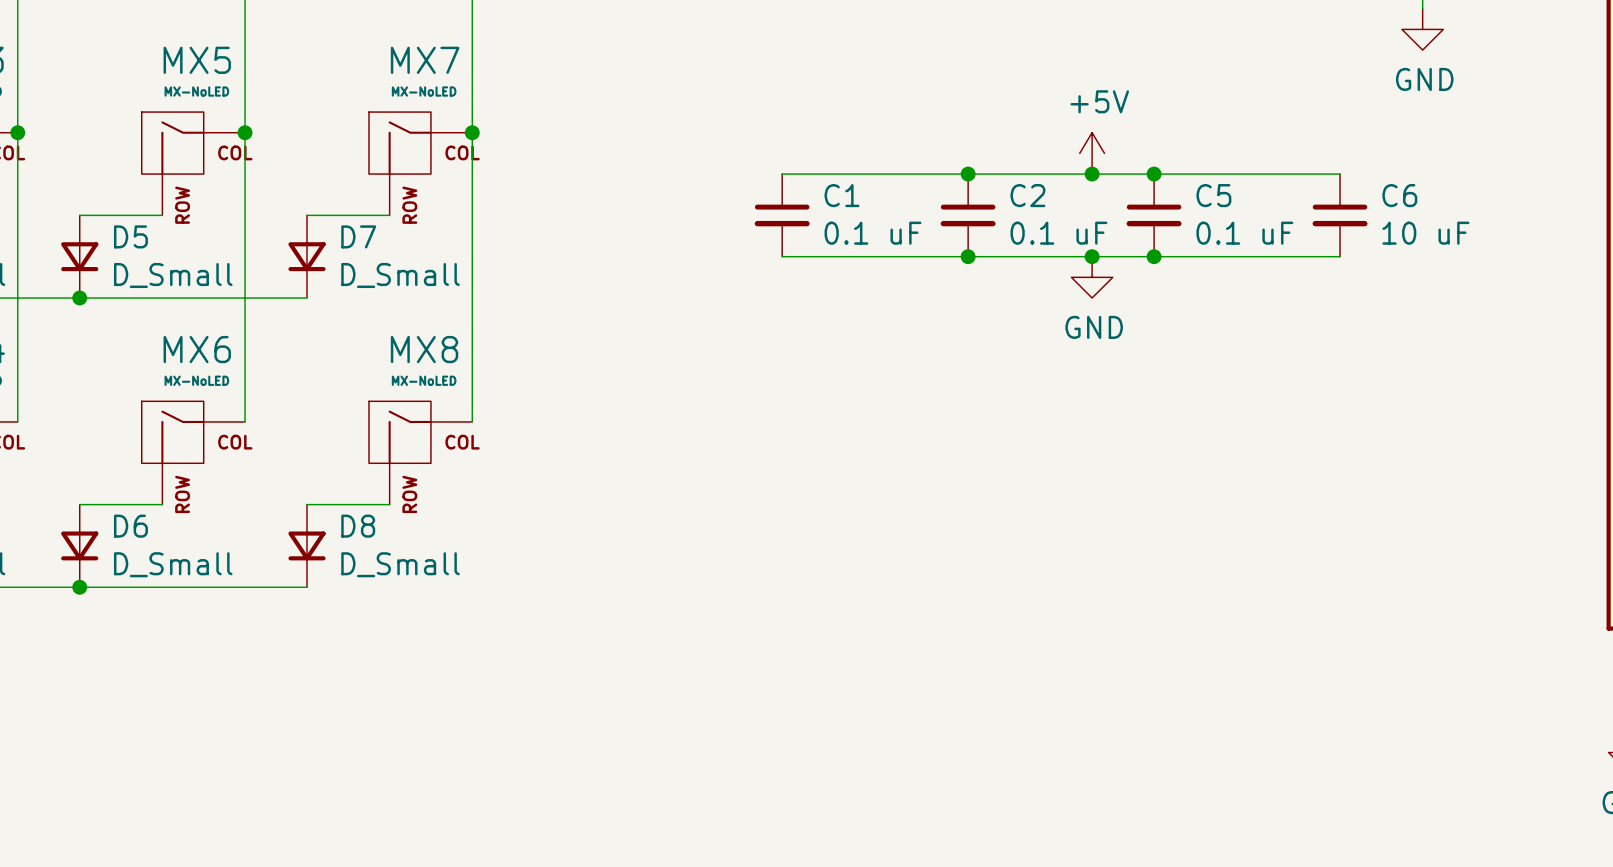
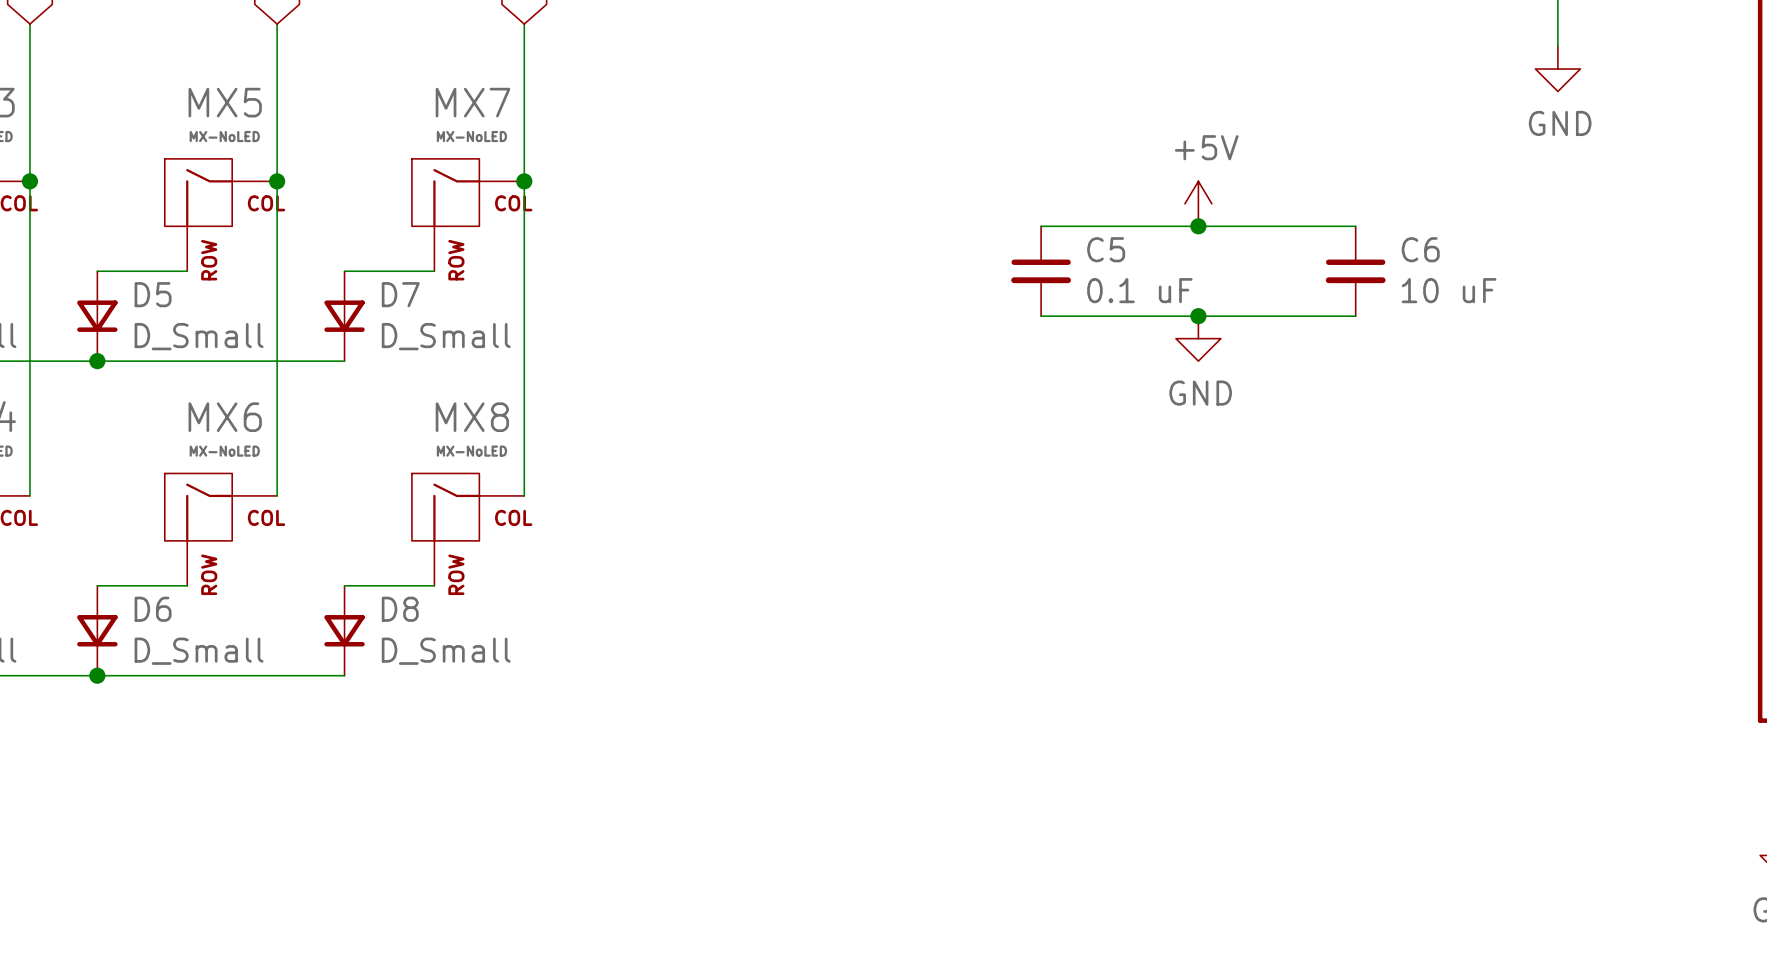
wire: (782, 174) (947, 174) -> none
junction: (968, 174) -> none
junction: (1154, 174) -> none
wire: (1236, 174) (1340, 174) -> none
C1: 0.1 uF (782, 215) -> none
C2: 0.1 uF (968, 215) -> none
C5 position: (1154, 215) -> (1041, 271)
C6 position: (1340, 215) -> (1355, 271)
wire: (782, 256) (947, 256) -> none
junction: (968, 256) -> none
junction: (1154, 256) -> none
wire: (1236, 256) (1340, 256) -> none

